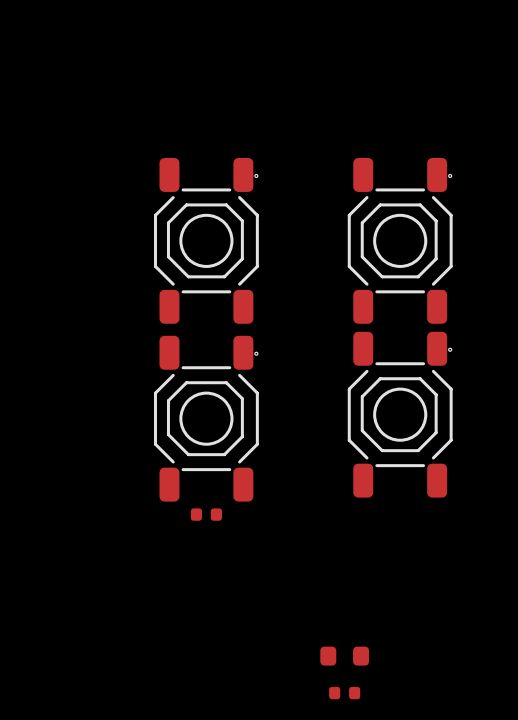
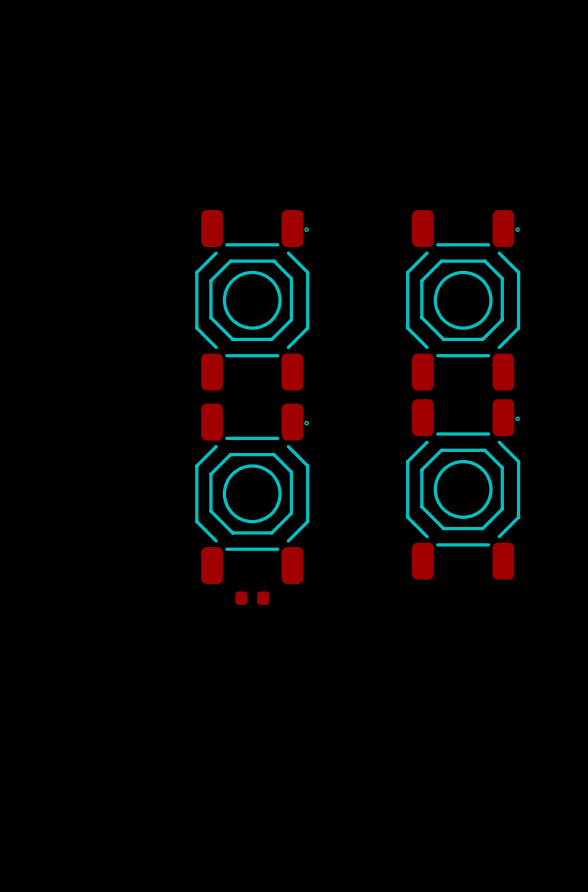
part: (344, 656) -> none
part: (344, 693) -> none

